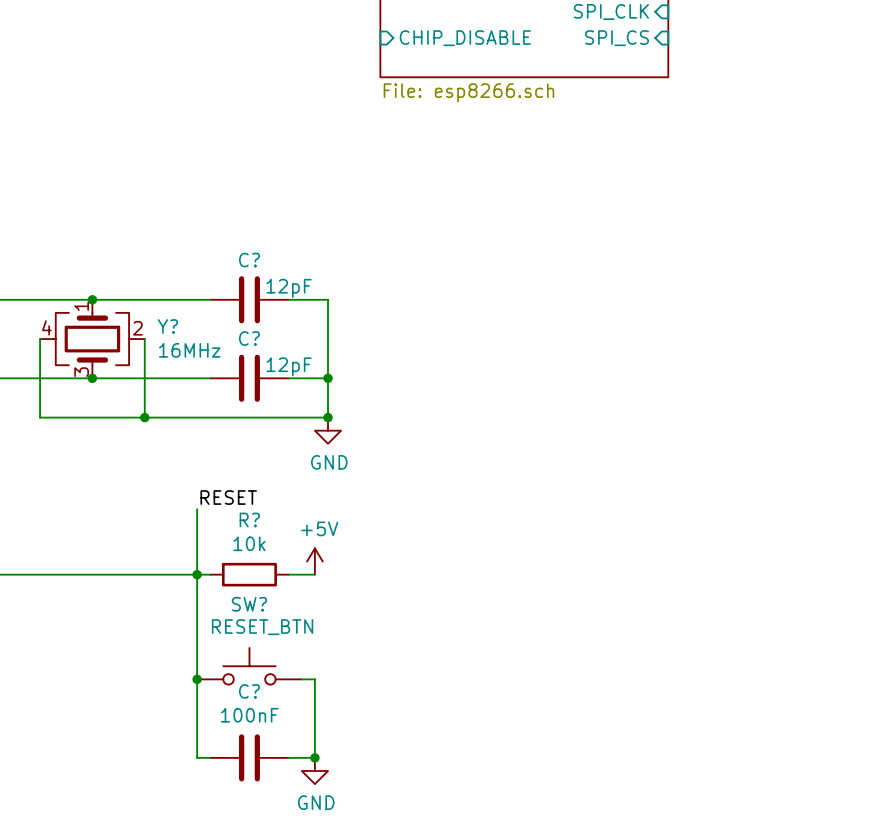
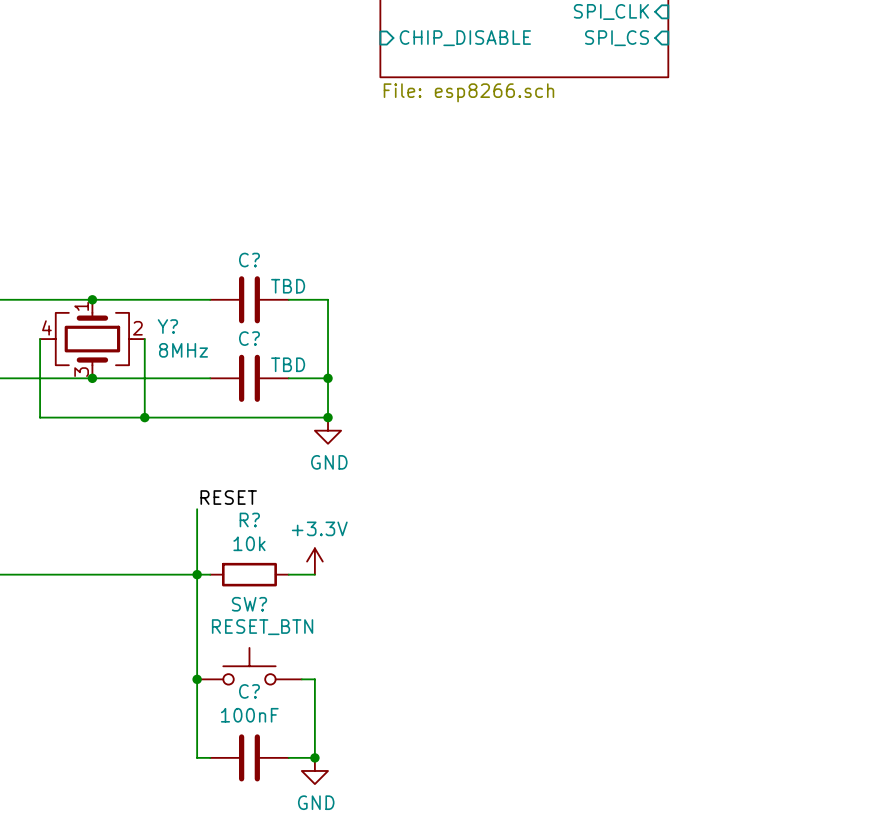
C? value: 12pF (289, 288) -> TBD (288, 286)
Y? value: 16MHz (189, 350) -> 8MHz (183, 350)
C? value: 12pF (289, 366) -> TBD (288, 364)
power symbol: +5V (314, 561) -> +3.3V (314, 561)

